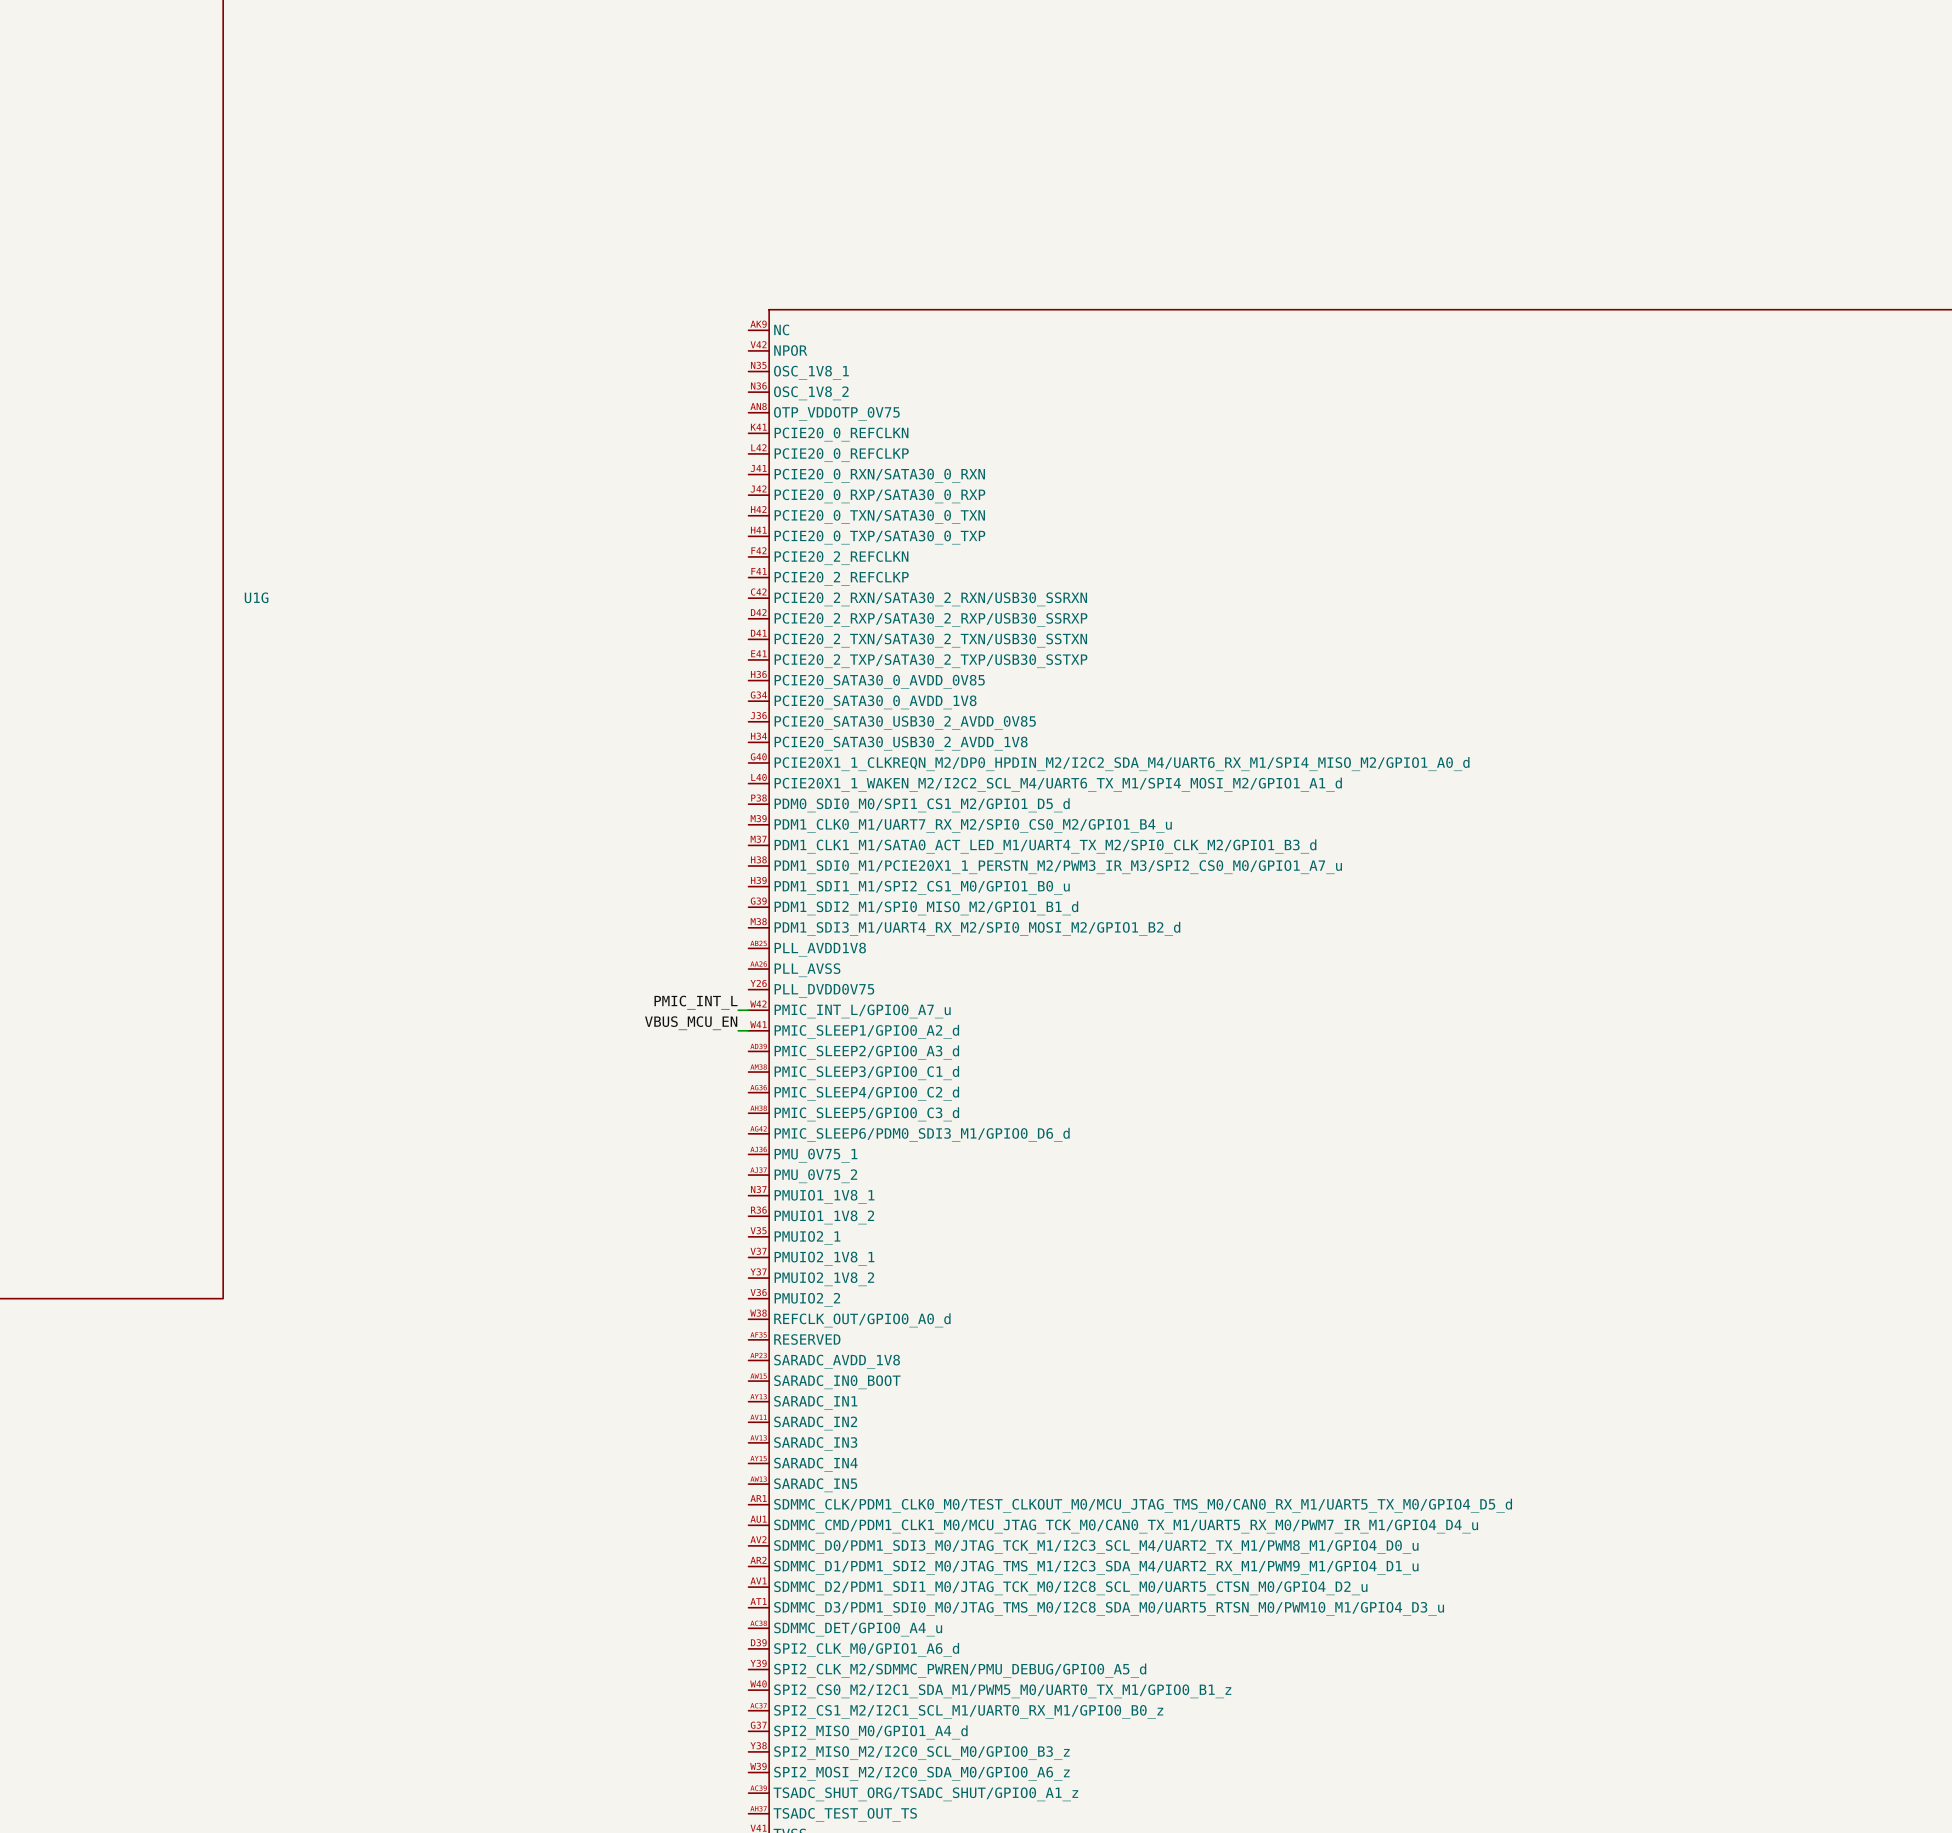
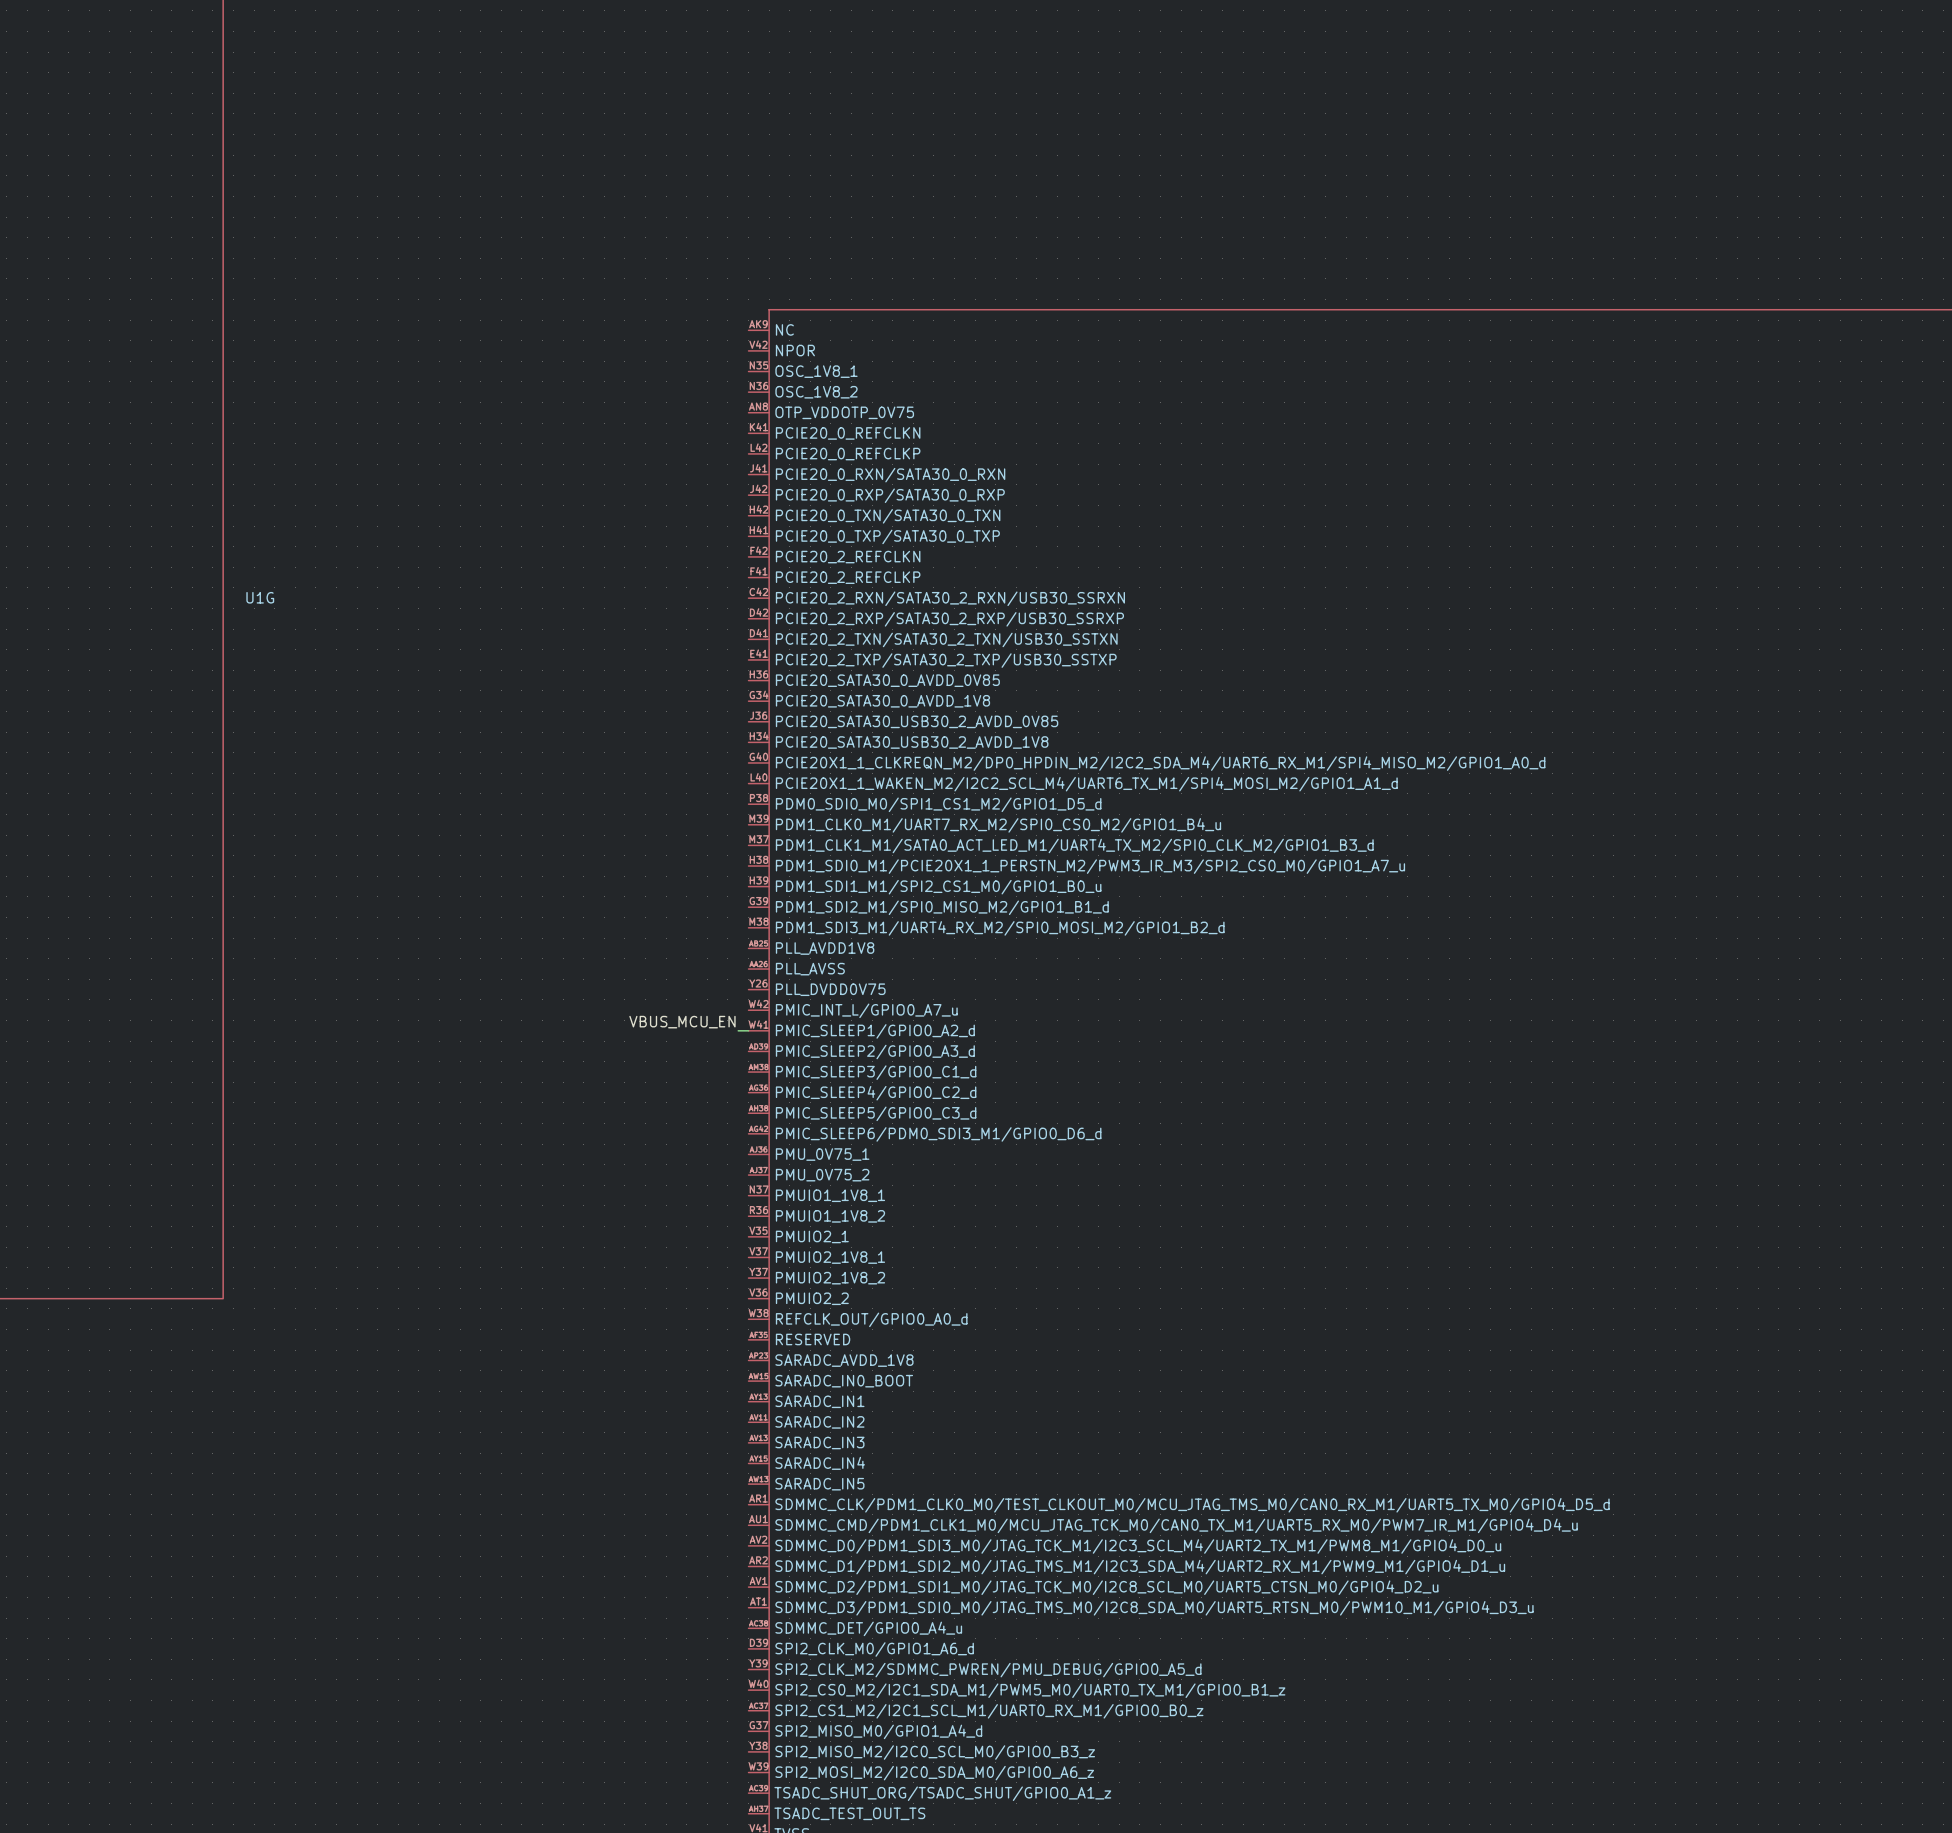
label: PMIC_INT_L (696, 1002) -> none
wire: (738, 1010) (748, 1010) -> none

